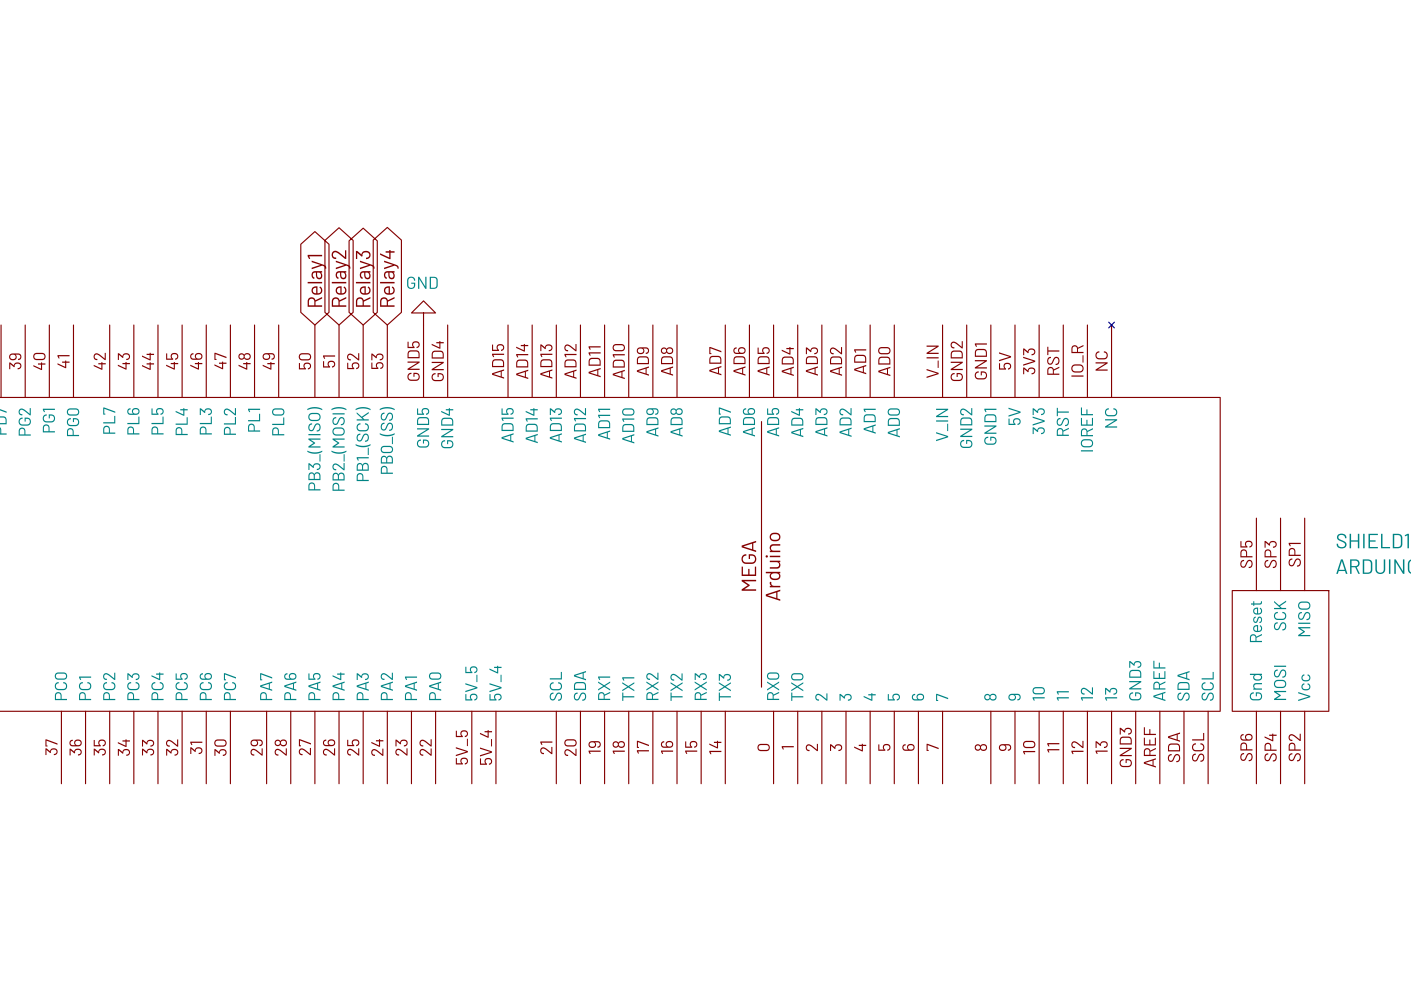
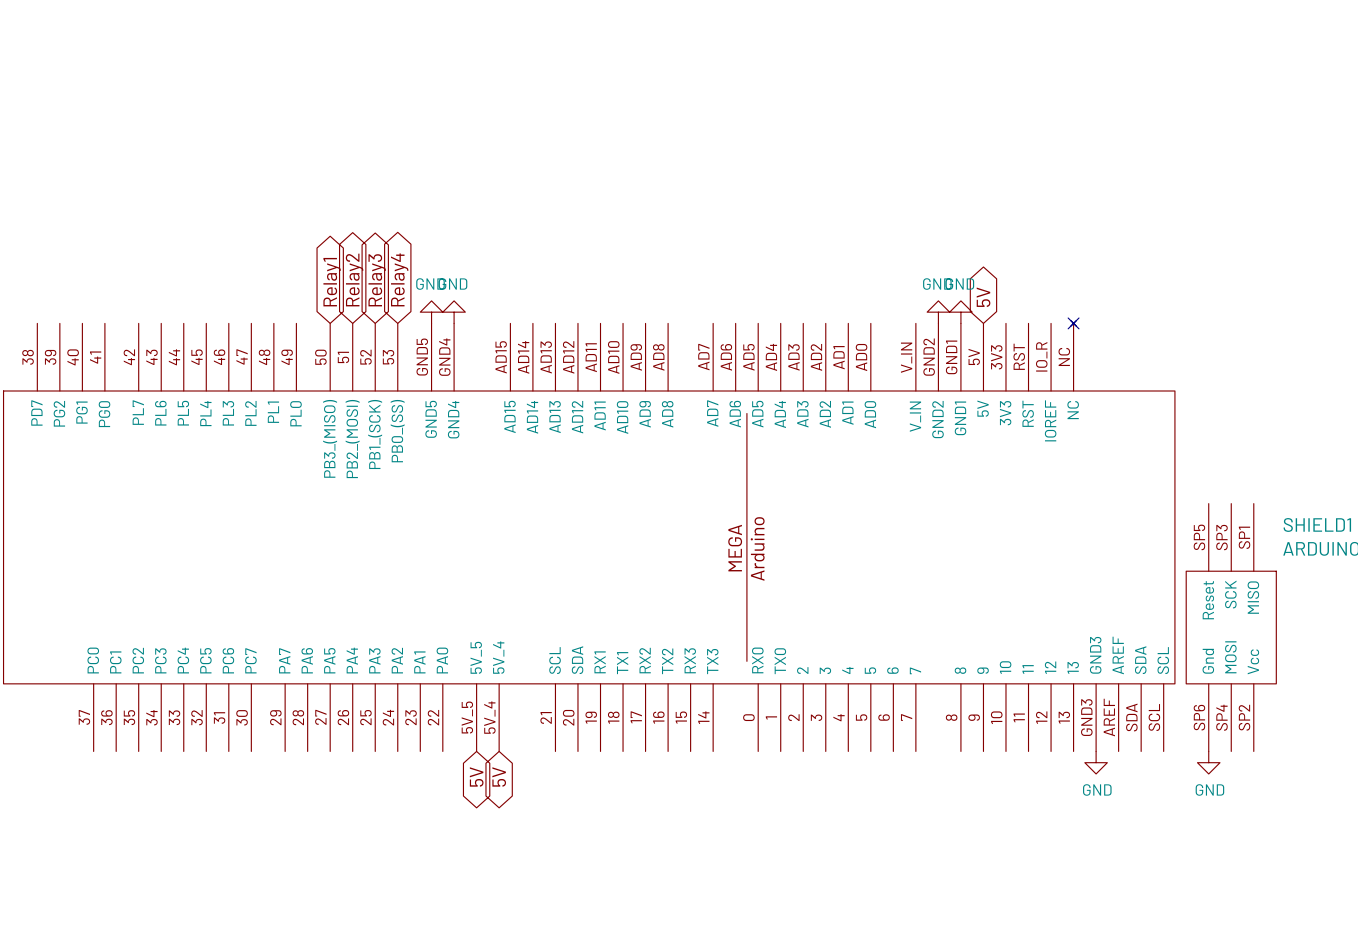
global label: none -> 5V (983, 297)
power symbol: none -> GND (454, 312)
power symbol: none -> GND (938, 312)
power symbol: none -> GND (960, 312)
no-connect mark: none -> (1073, 323)
power symbol: none -> GND (1096, 762)
power symbol: none -> GND (1208, 762)
global label: none -> 5V (476, 776)
global label: none -> 5V (499, 776)

